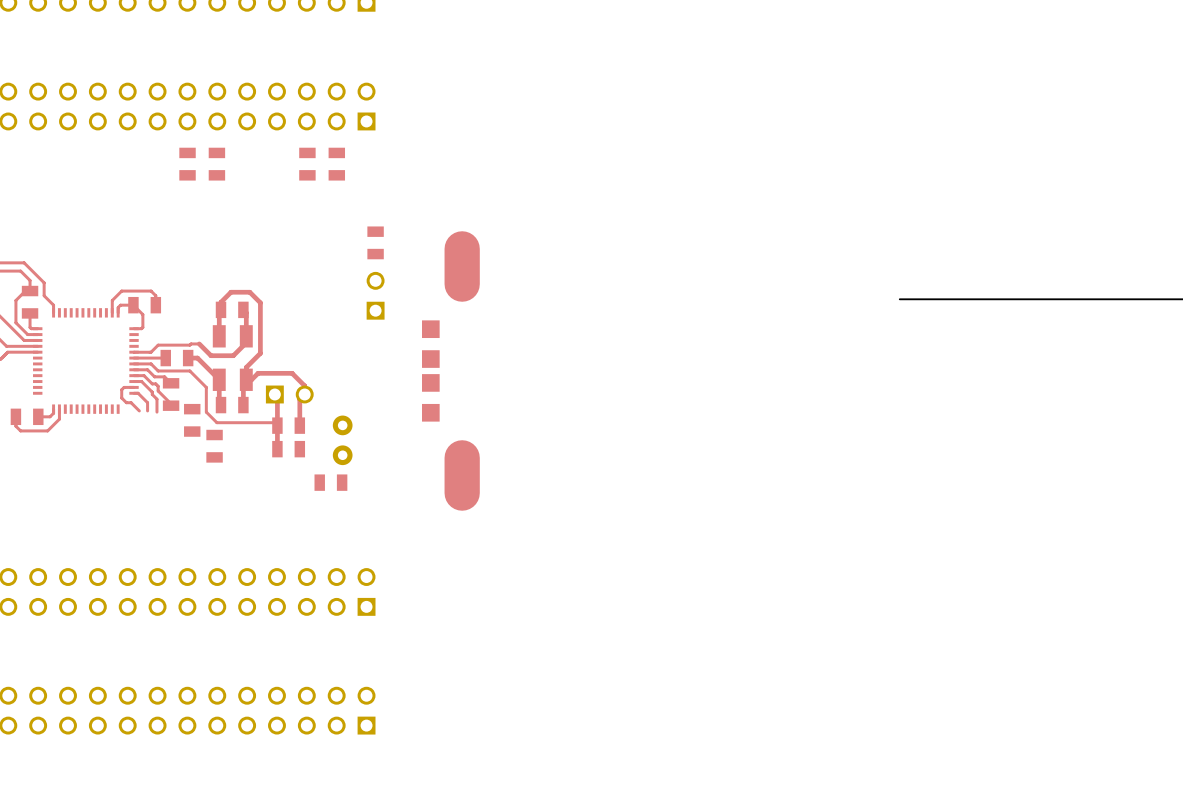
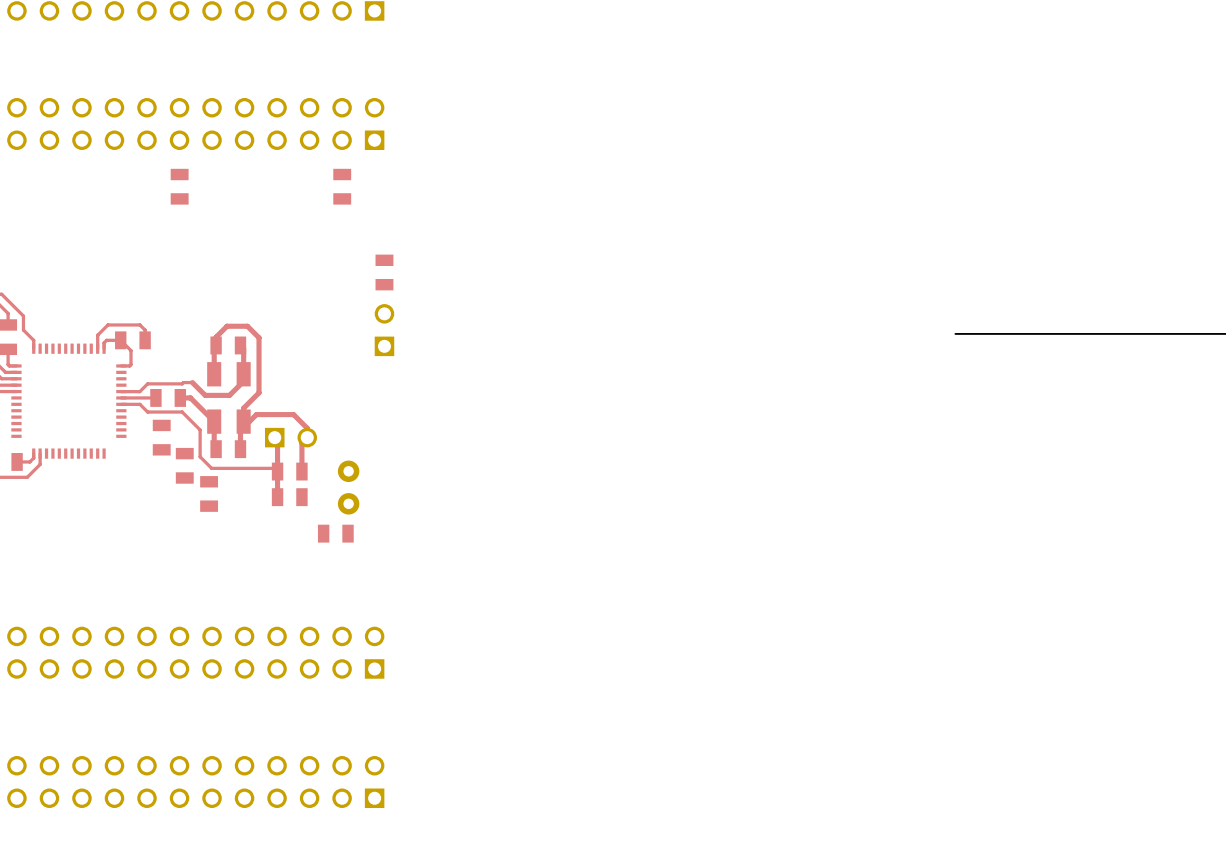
part: (216, 164) -> none
part: (307, 164) -> none
top track: (134, 369) (147, 369) (154, 376) (164, 376) (171, 383) -> none
part: (450, 370) -> none
top track: (134, 375) (144, 375) (152, 383) (155, 383) (158, 390) (171, 405) -> none
top track: (134, 381) (141, 381) (152, 392) (156, 399) (156, 412) -> none
top track: (134, 387) (124, 387) (121, 389) (121, 398) (126, 402) (131, 402) (139, 410) -> none
top track: (134, 393) (138, 393) (147, 402) (147, 410) -> none

